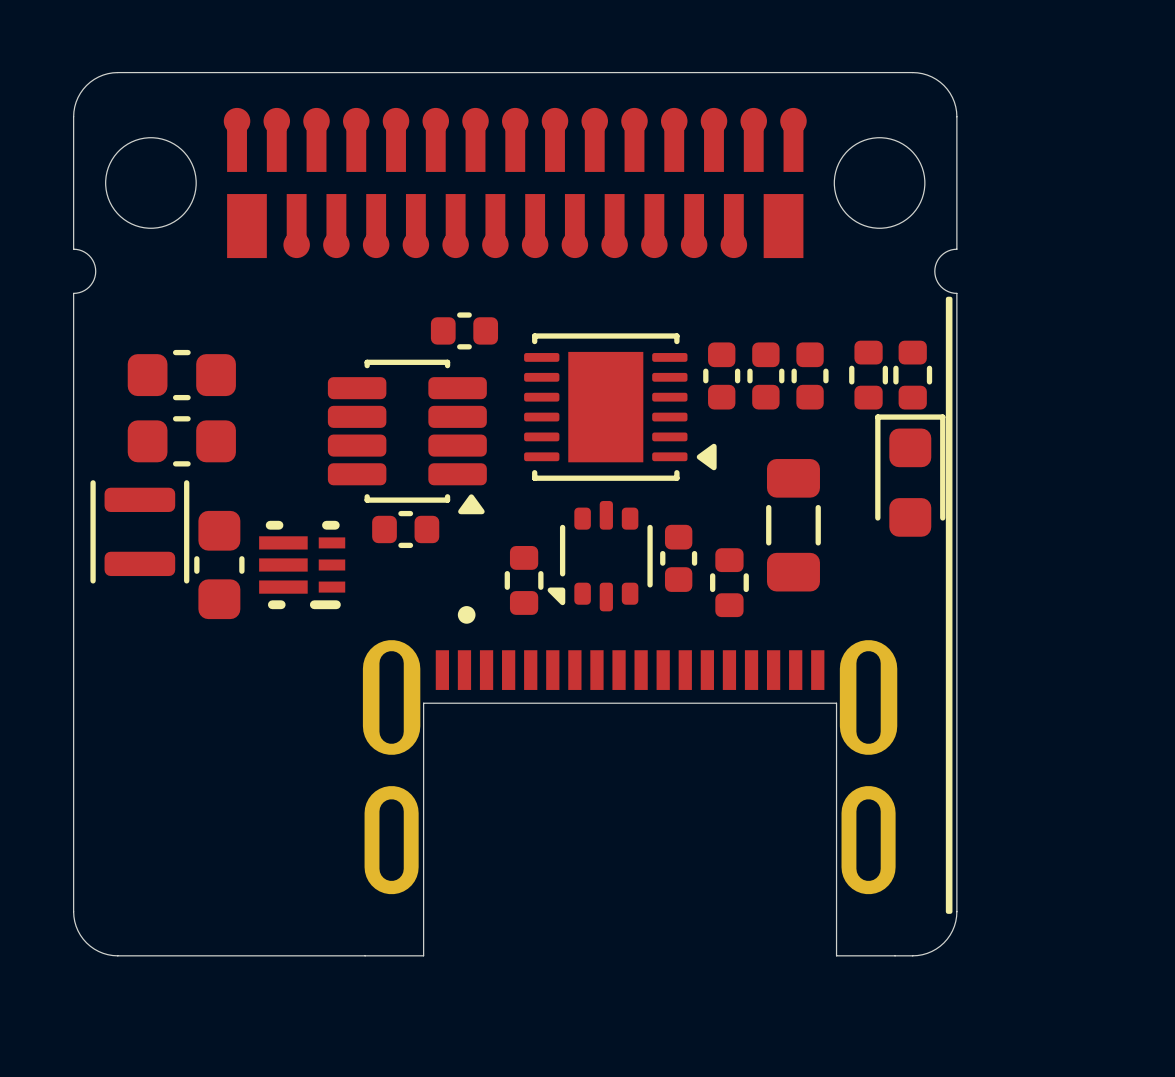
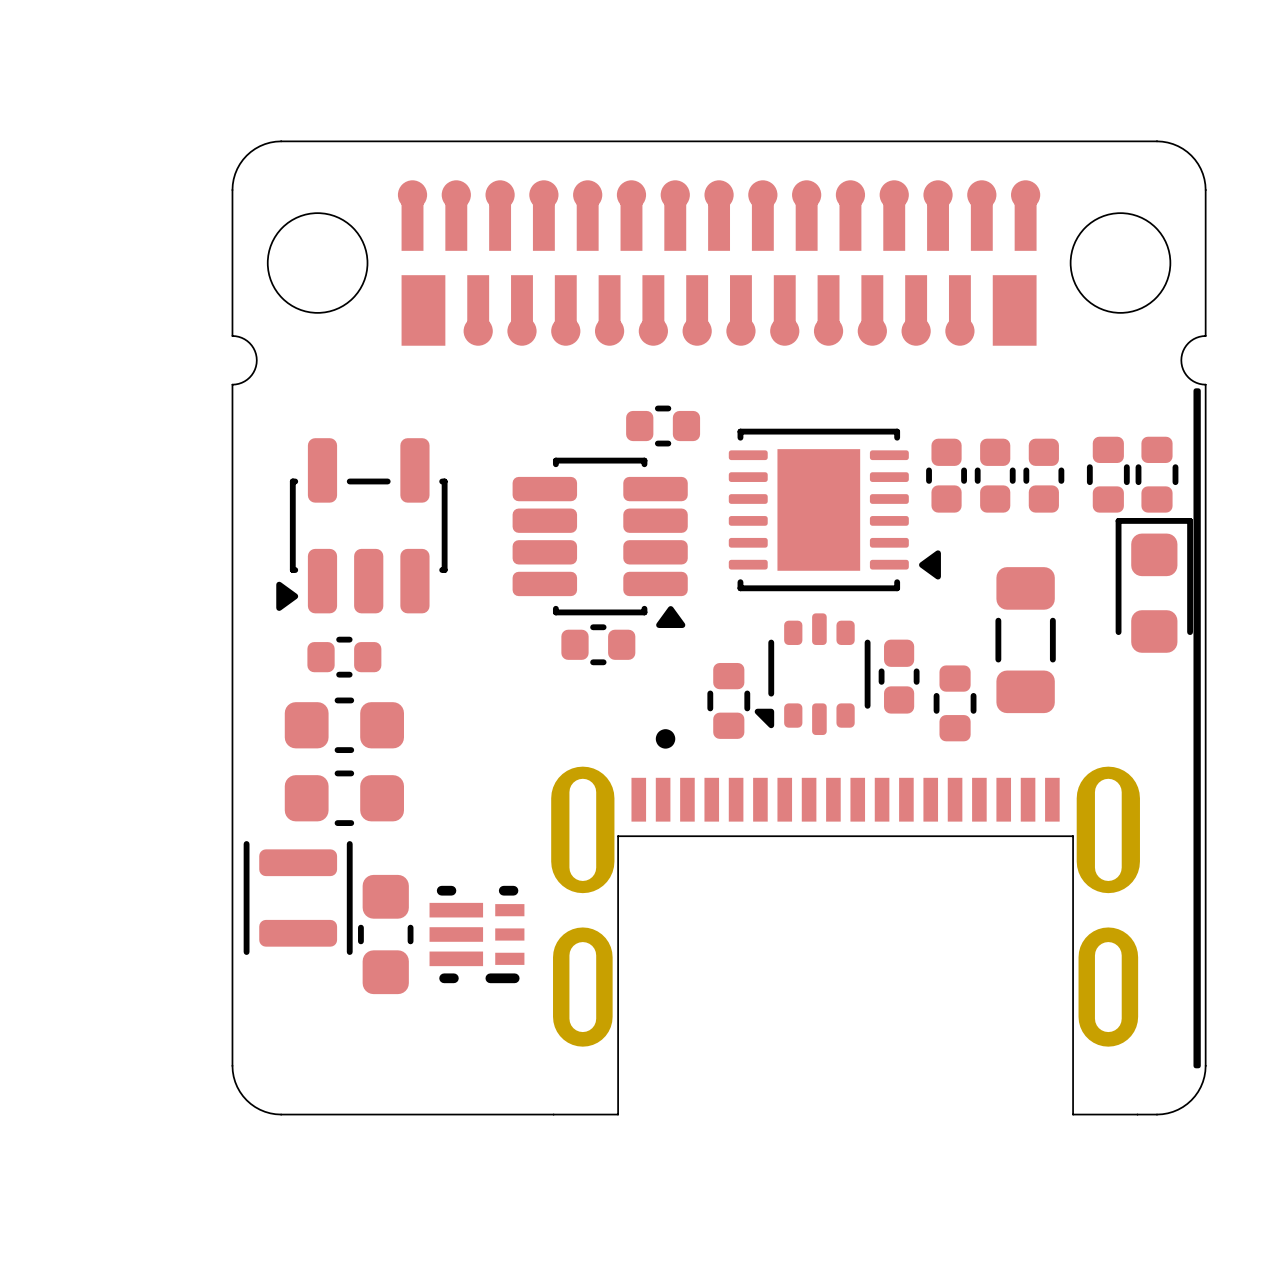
part: (181, 375) -> none
part footprint: [127, 416, 236, 467] -> [276, 438, 448, 614]
part position: (139, 531) -> (298, 898)
part: none -> (344, 657)
part: (219, 564) -> none
part position: (302, 564) -> (476, 934)
part: none -> (344, 725)
part: none -> (344, 798)
part: none -> (385, 934)

